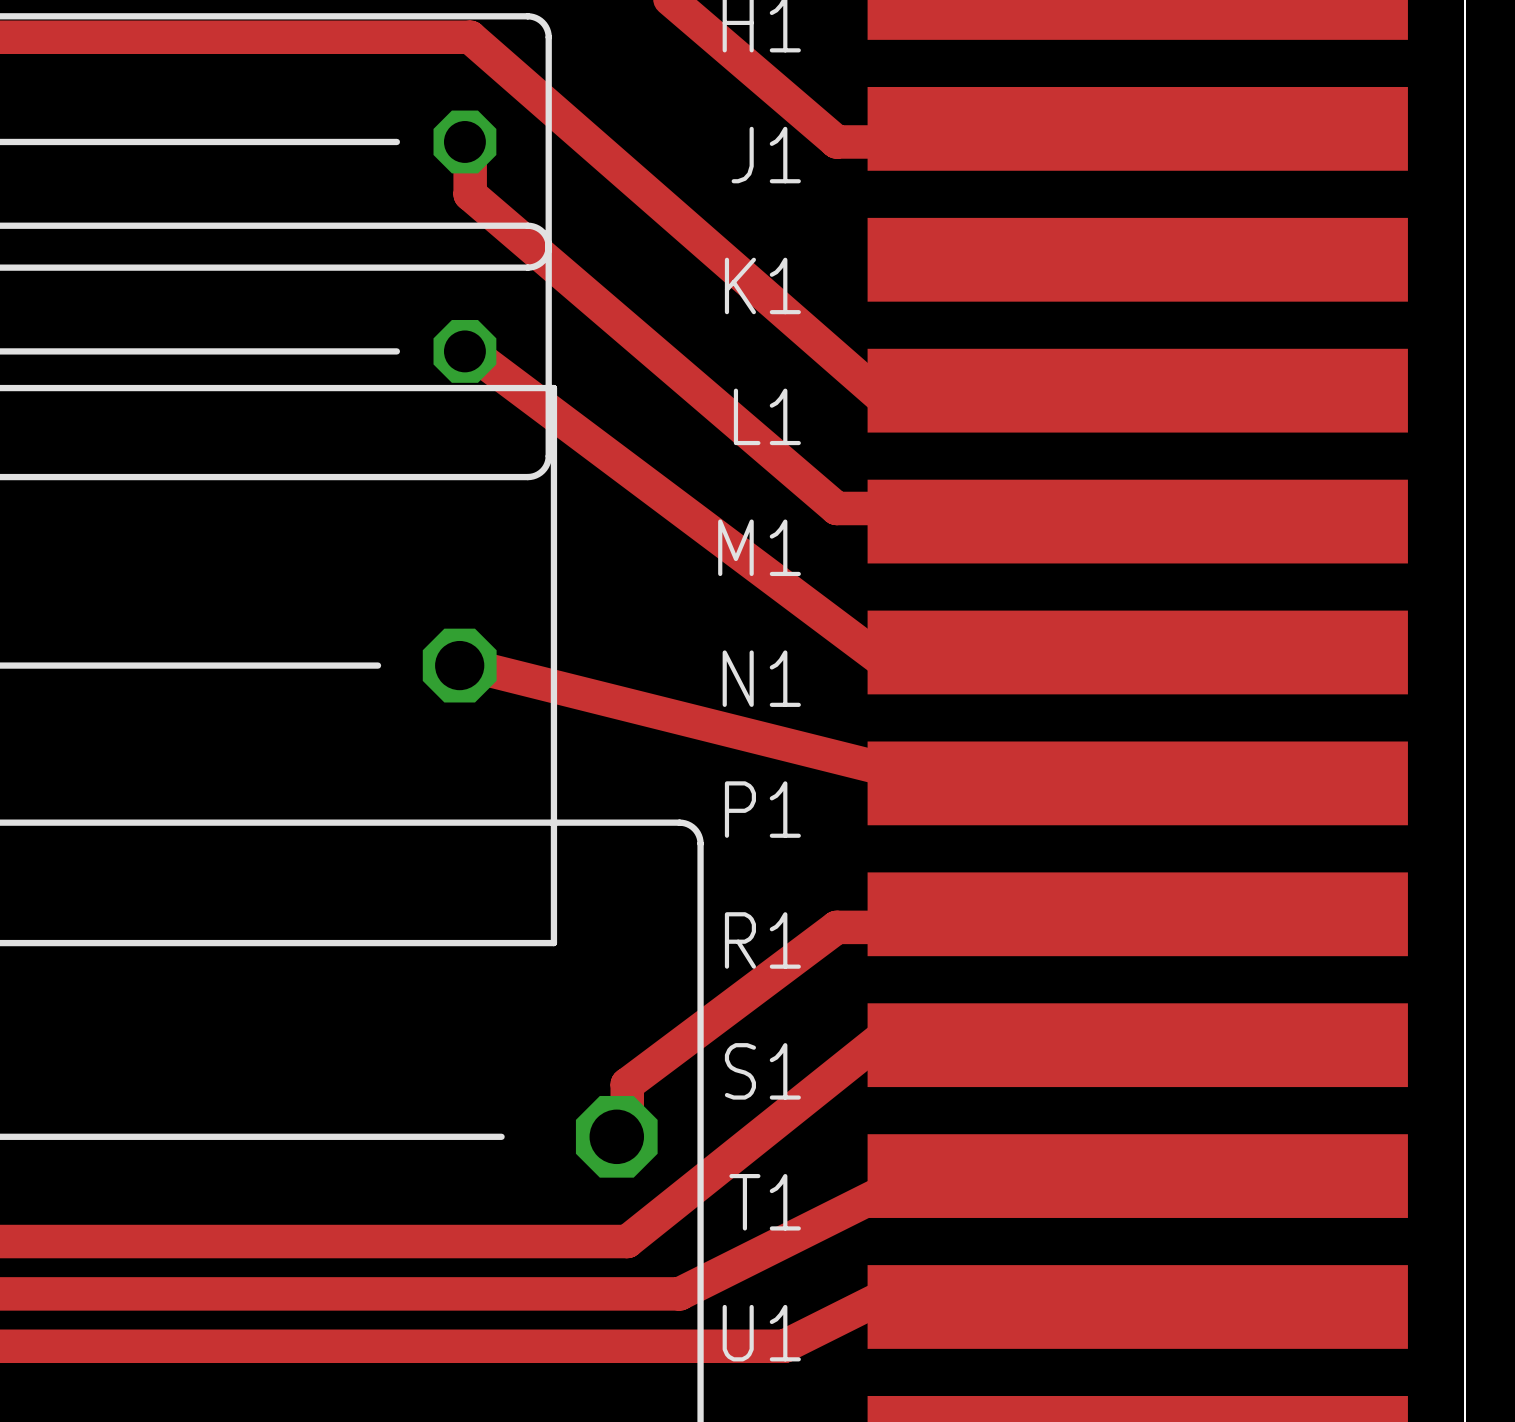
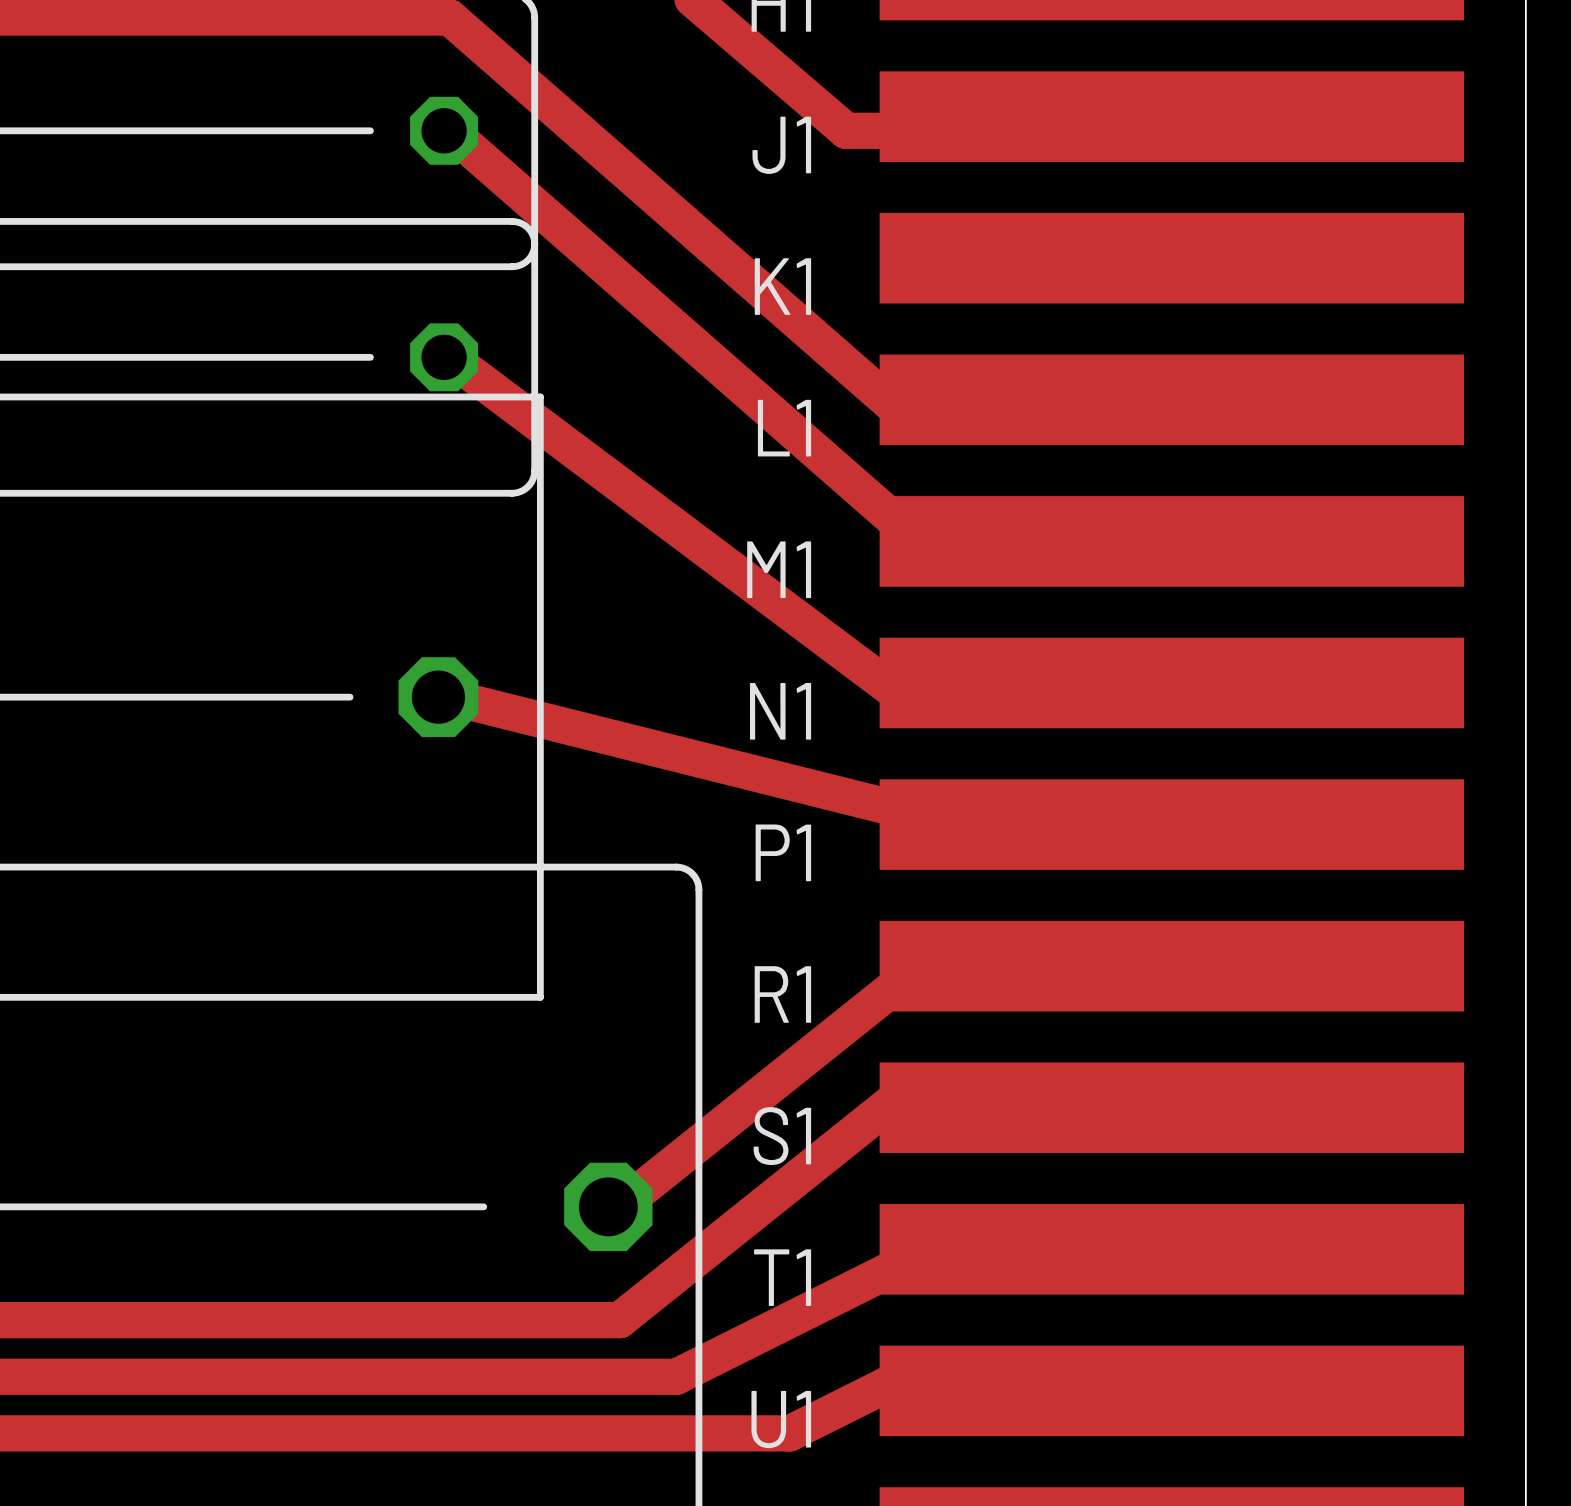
track: (470, 141) (470, 194) (836, 508) (889, 508) -> (449, 130) (902, 527)
track: (889, 927) (836, 927) (627, 1084) (627, 1136) -> (902, 980) (619, 1206)

